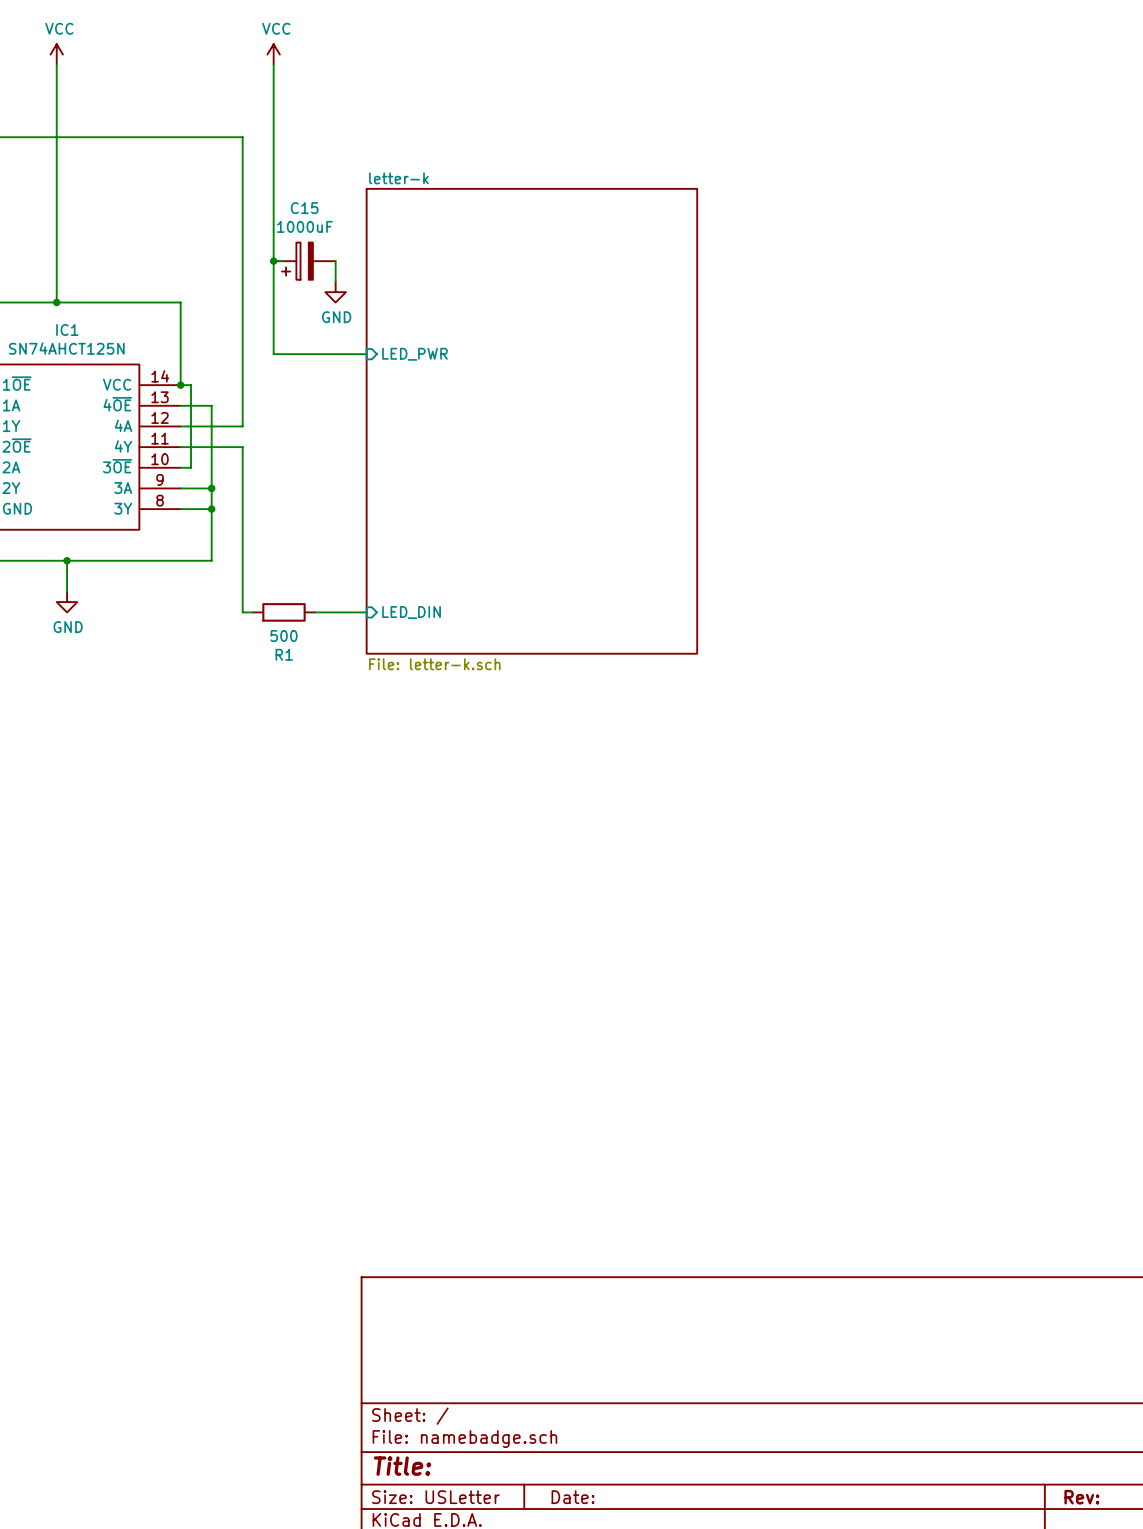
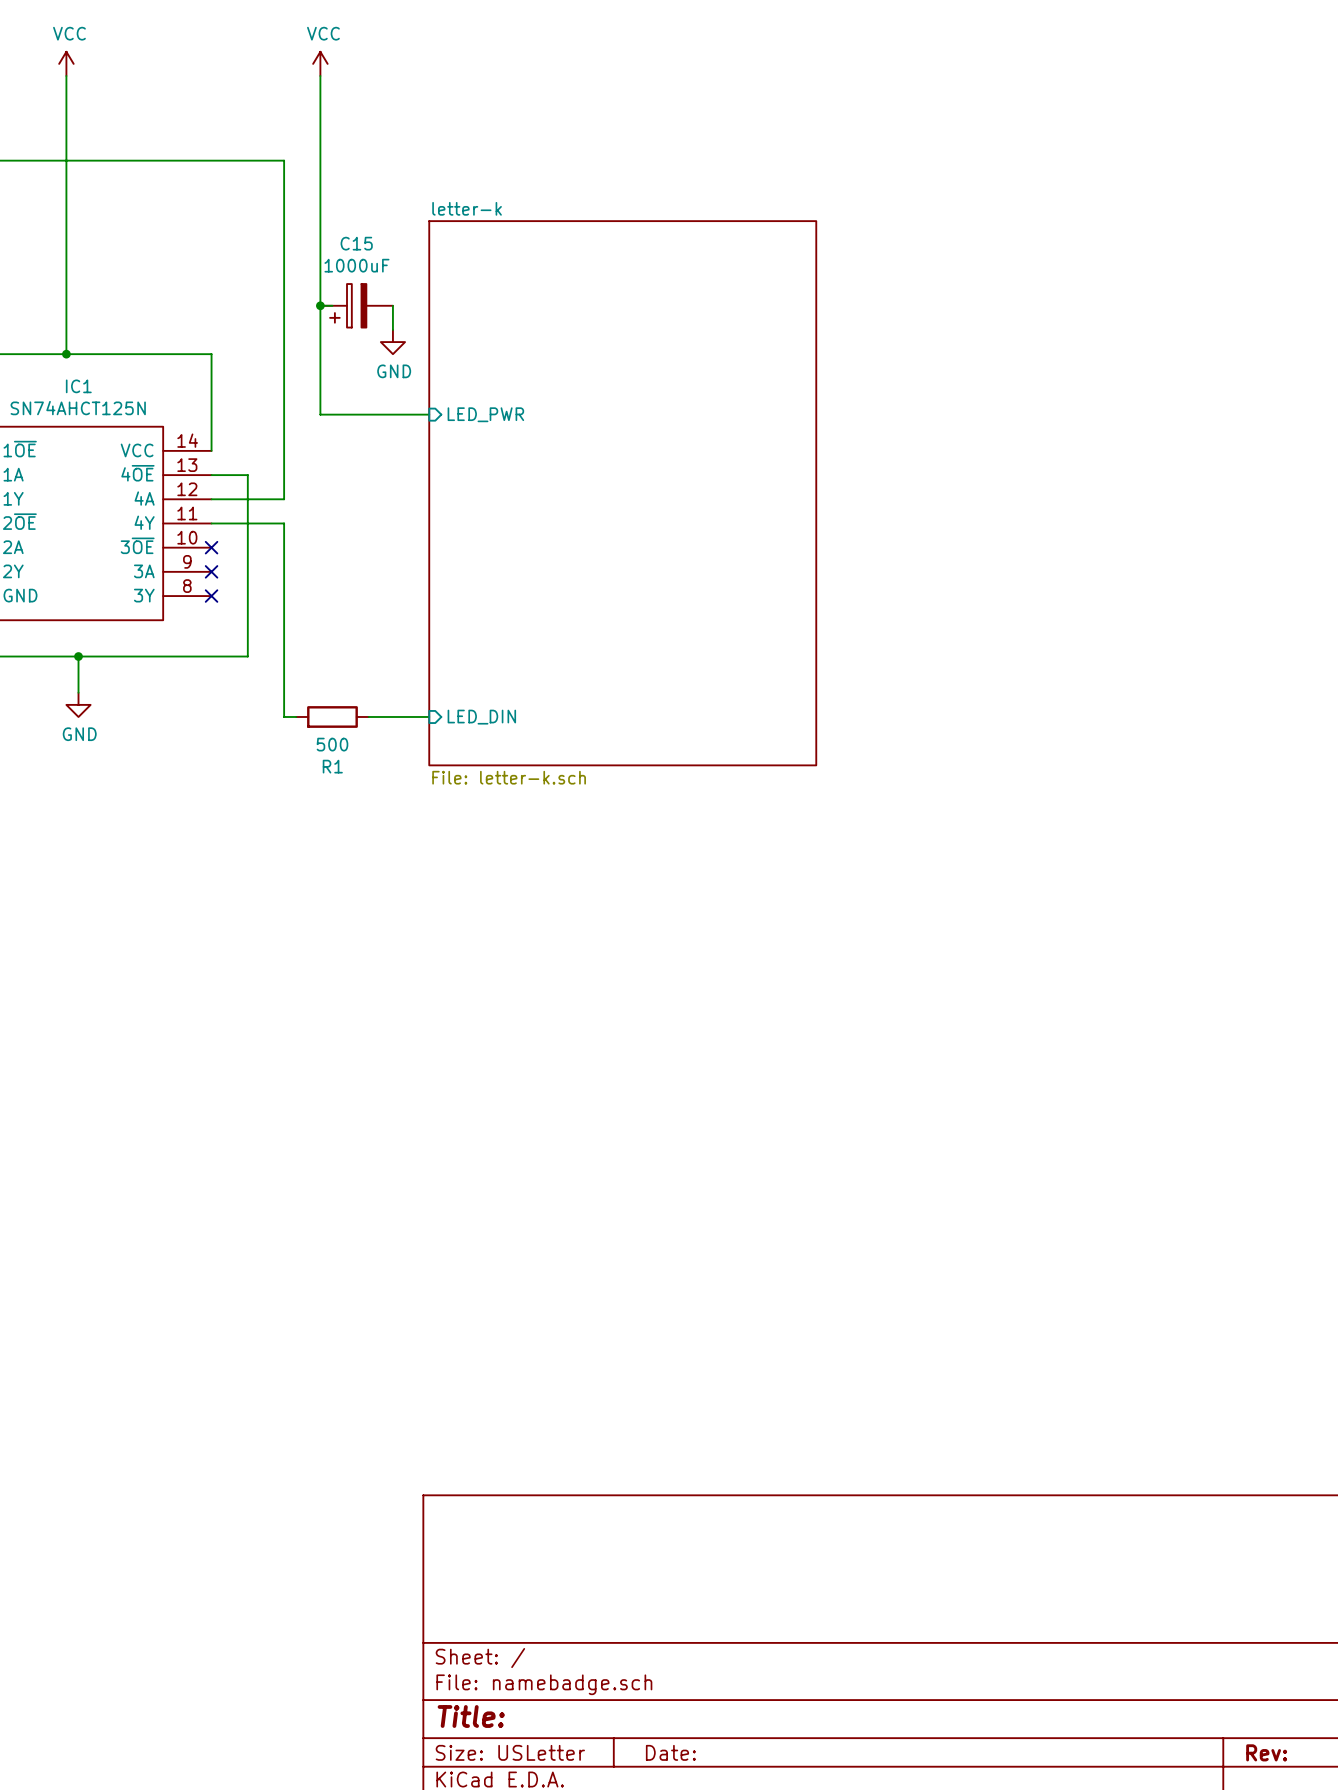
wire: (180, 385) (191, 385) (191, 467) (180, 467) -> none
junction: (180, 385) -> none
no-connect mark: none -> (211, 547)
wire: (180, 488) (211, 488) -> none
no-connect mark: none -> (211, 571)
junction: (211, 488) -> none
wire: (180, 509) (211, 509) -> none
no-connect mark: none -> (211, 596)
junction: (211, 509) -> none

